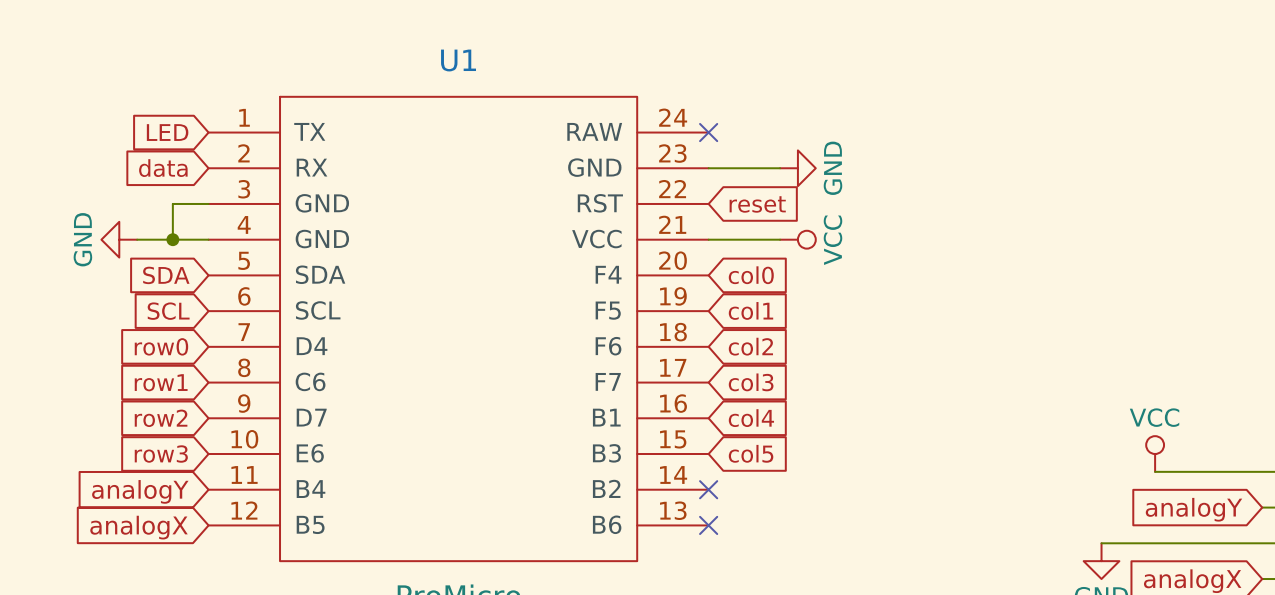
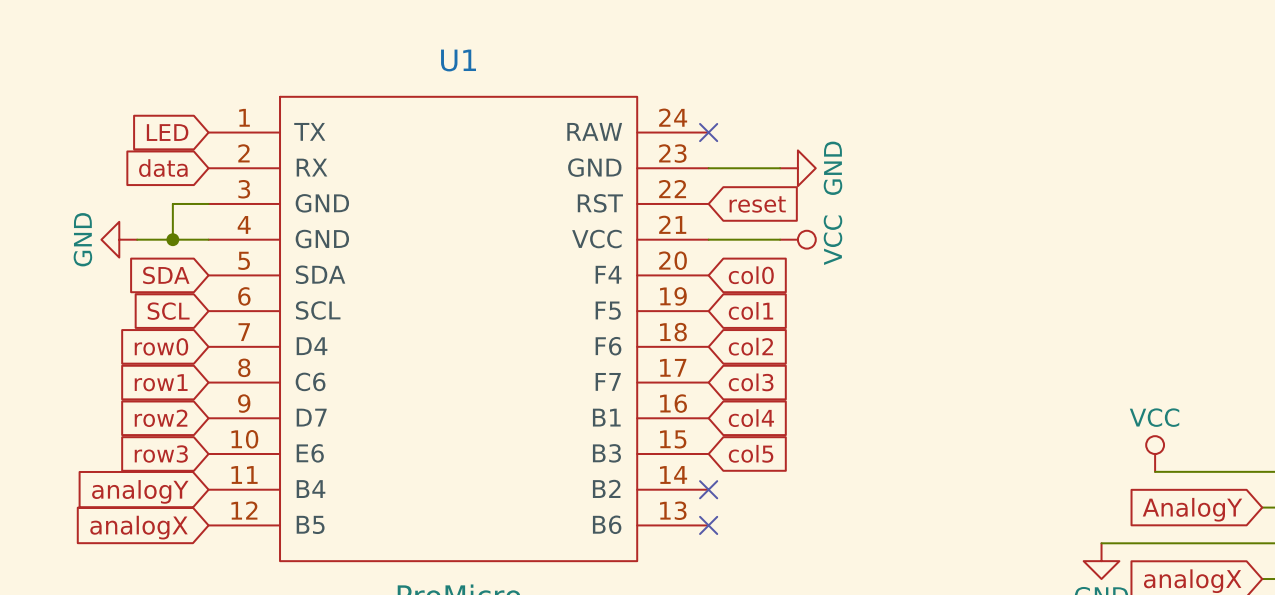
global label: analogY (1194, 509) -> AnalogY (1192, 509)

